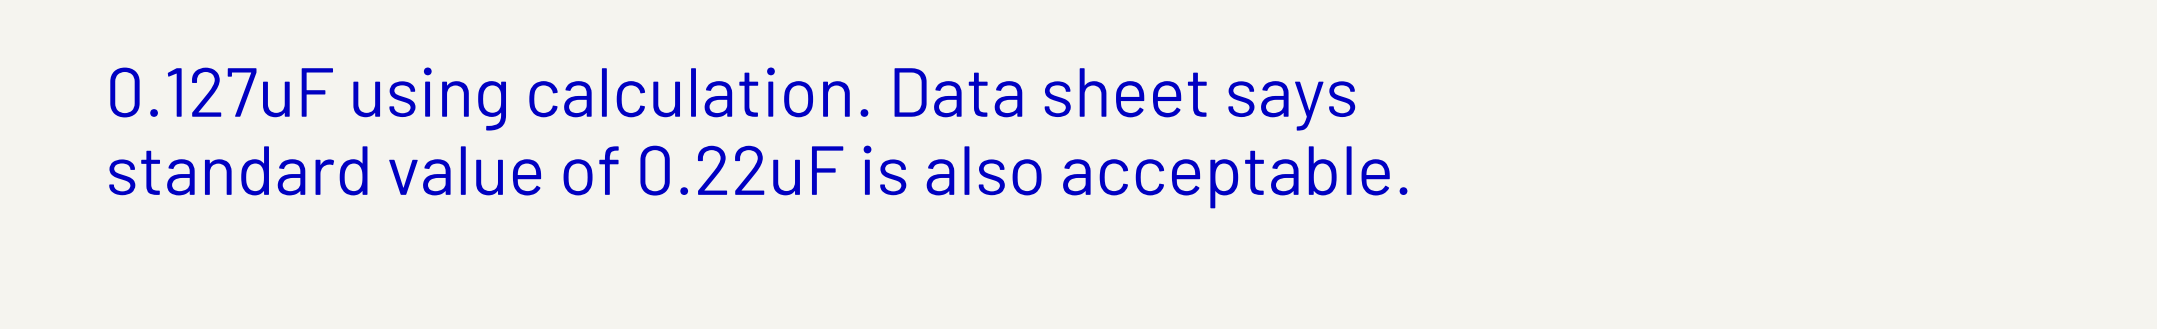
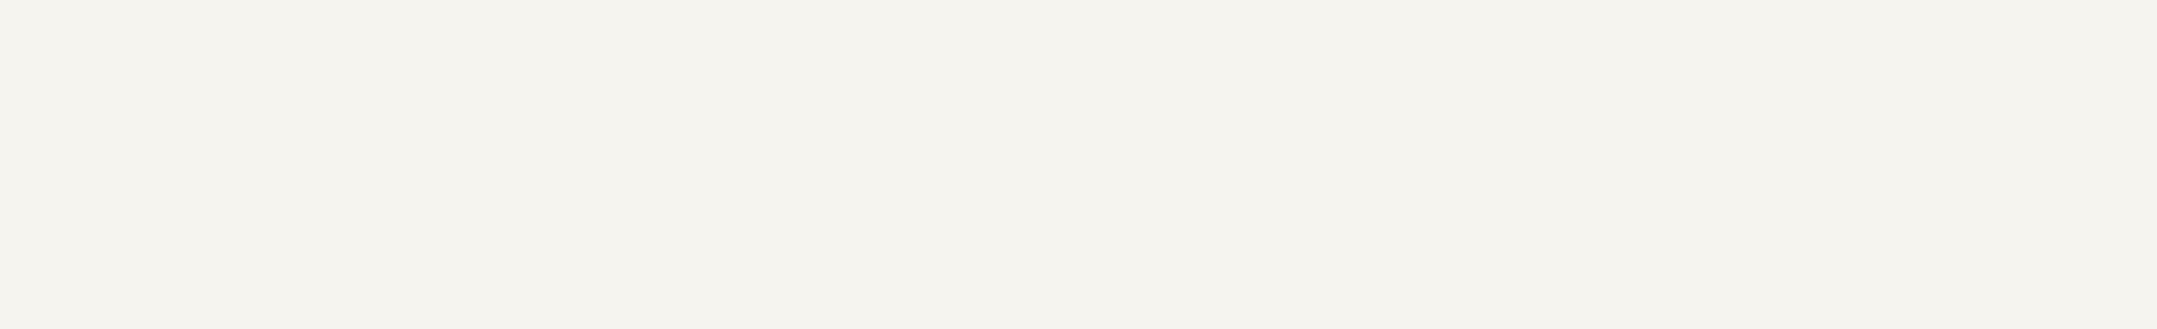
text: 0.127uF using calculation. Data sheet says (732, 99) -> none
text: standard value of 0.22uF is also acceptable. (758, 176) -> none

